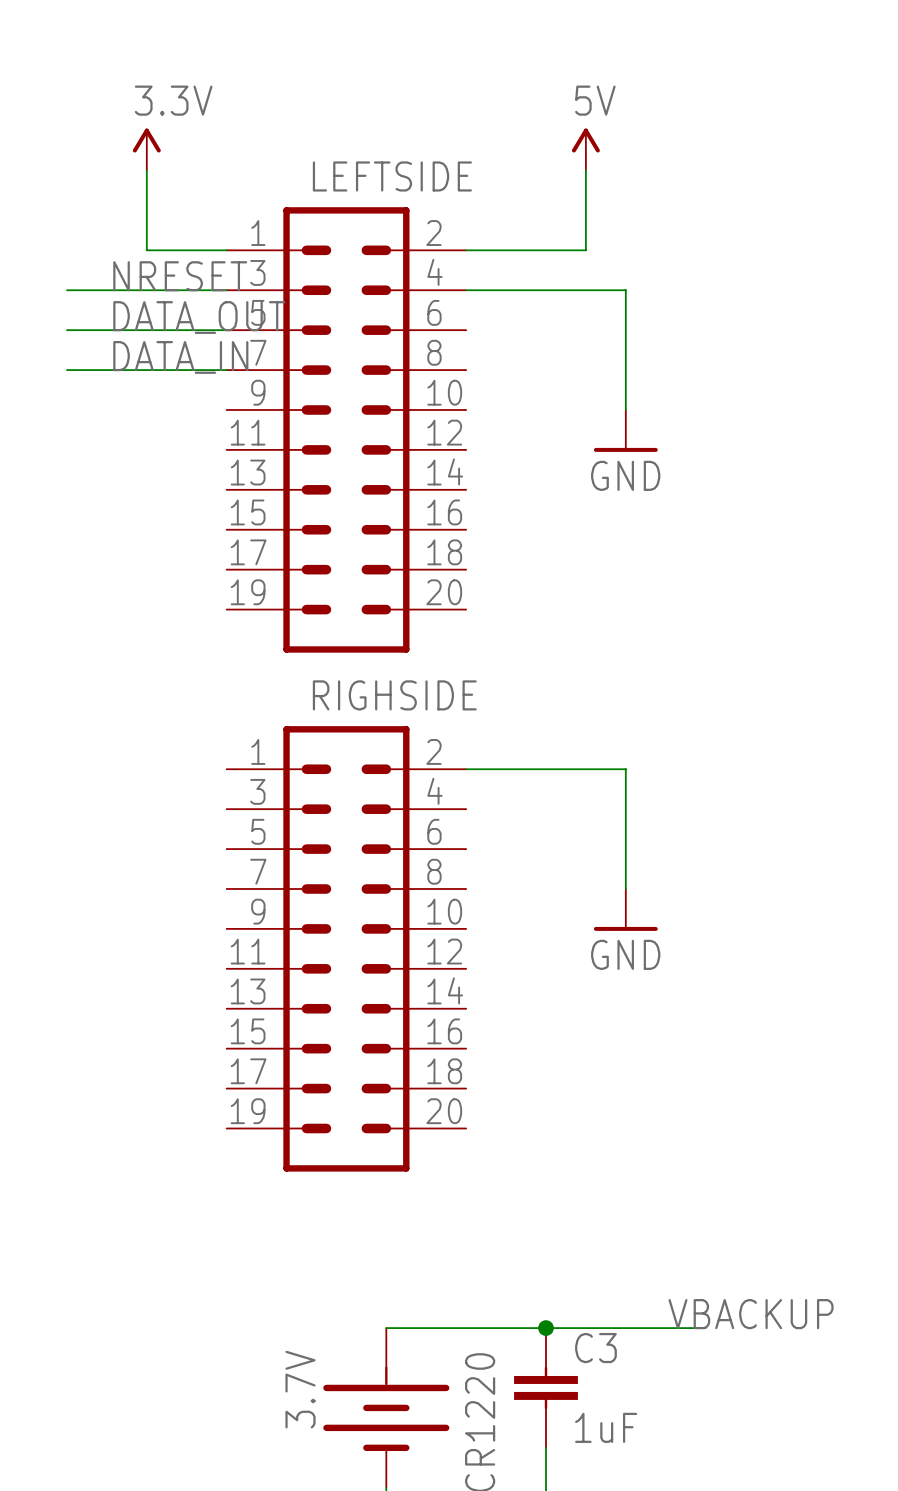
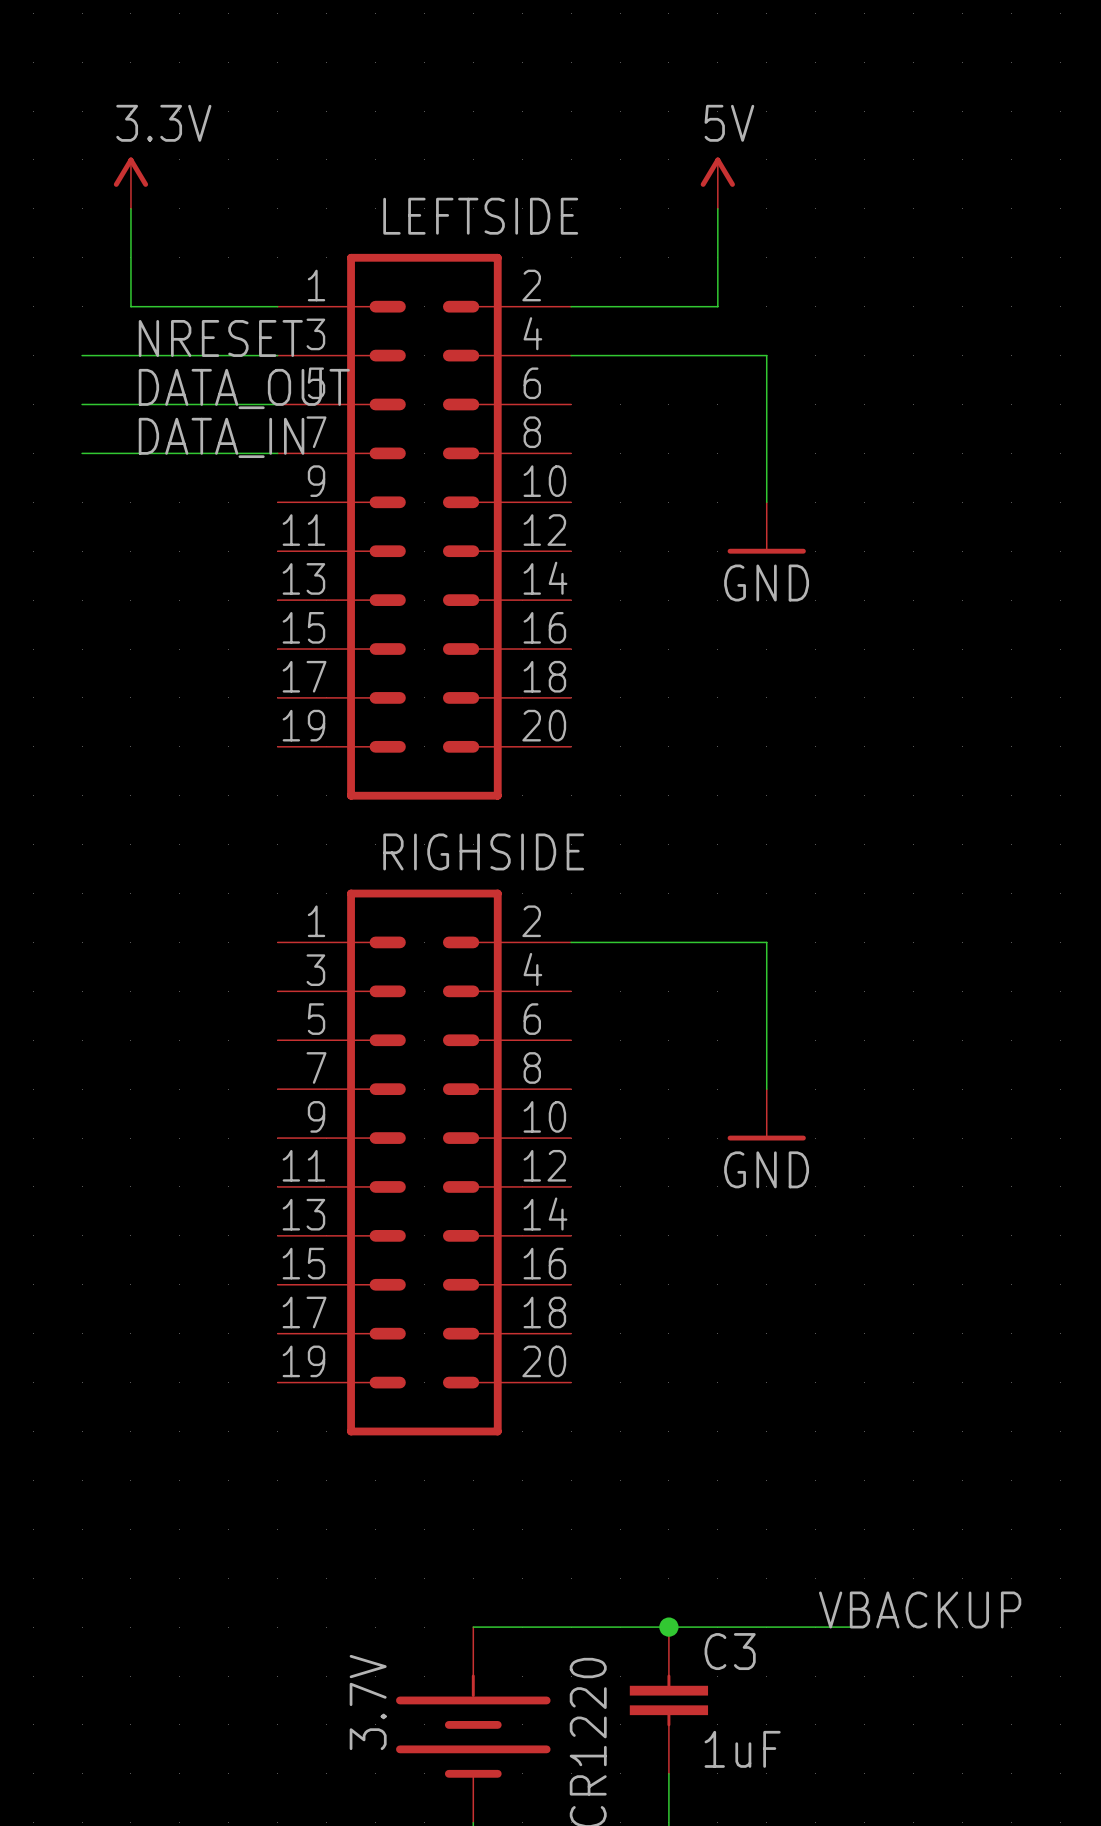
power symbol position: 3.3V (146, 149) -> 3.3V (130, 183)
wire: (146, 170) (146, 250) -> (130, 208) (130, 306) (179, 306)

